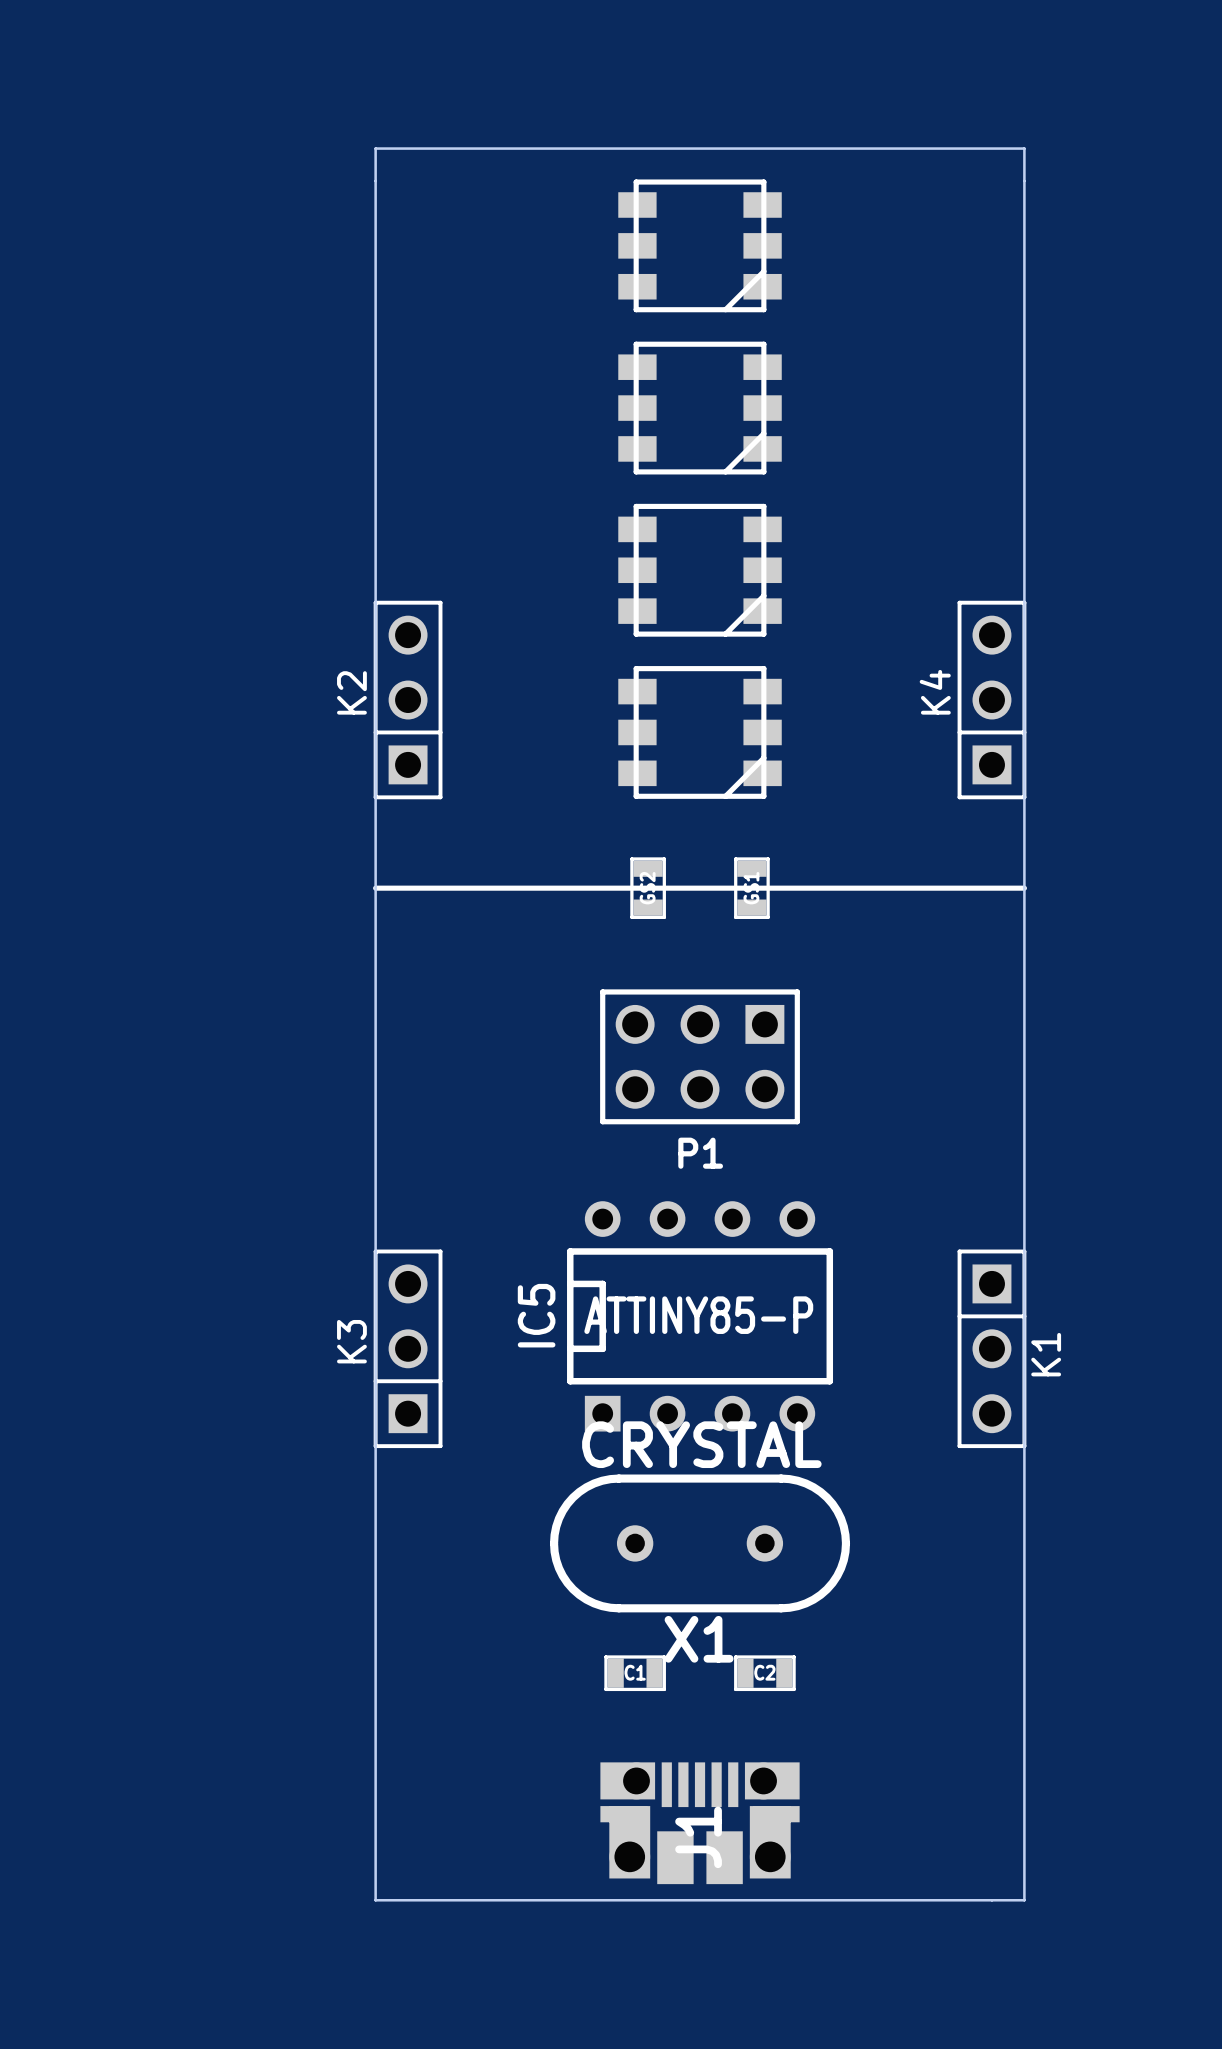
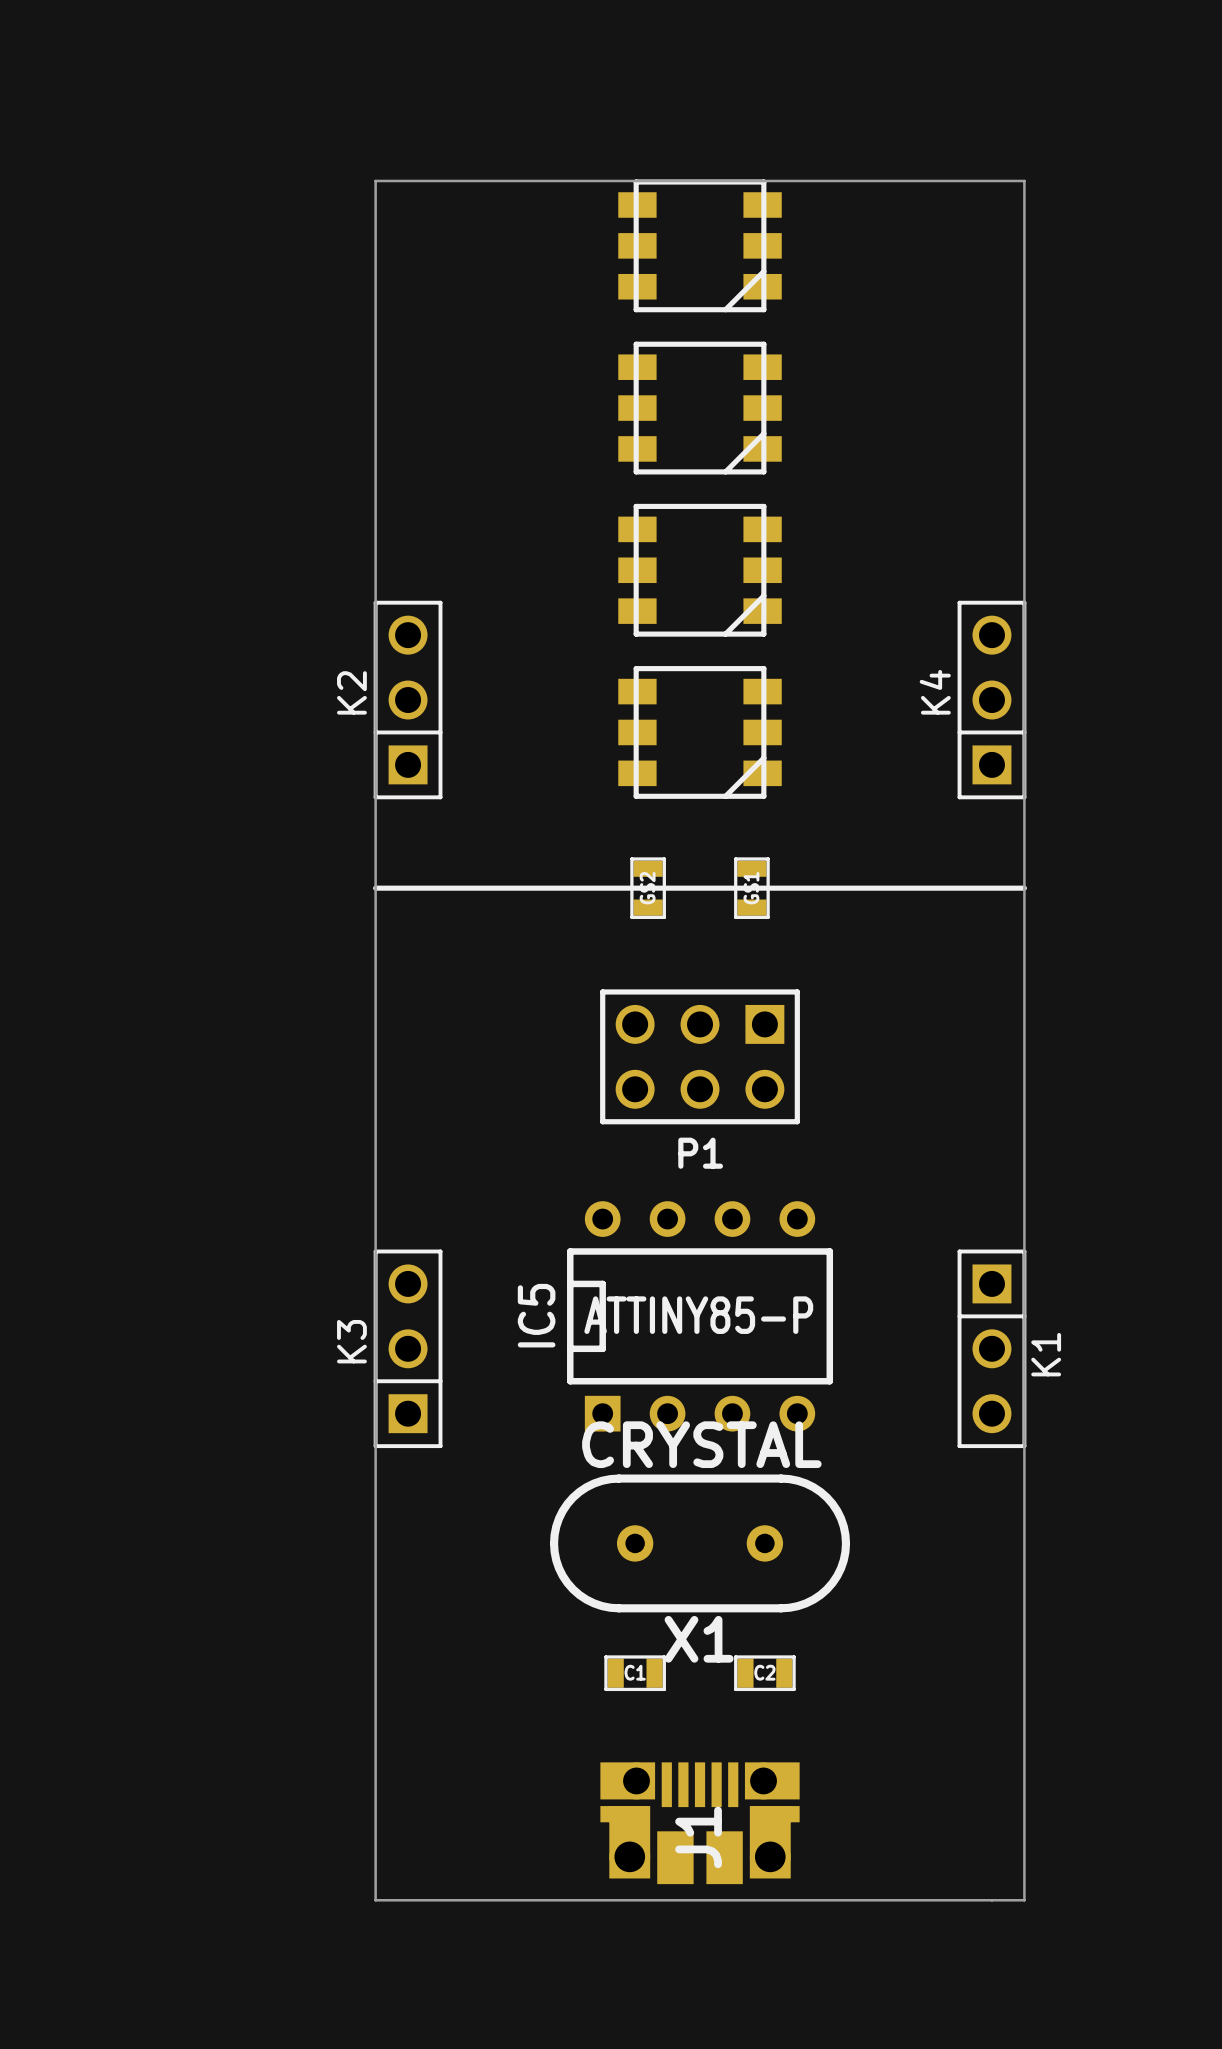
board edge: (375, 180) (375, 148) (1024, 148) (1024, 180) -> (375, 180) (1024, 180)

